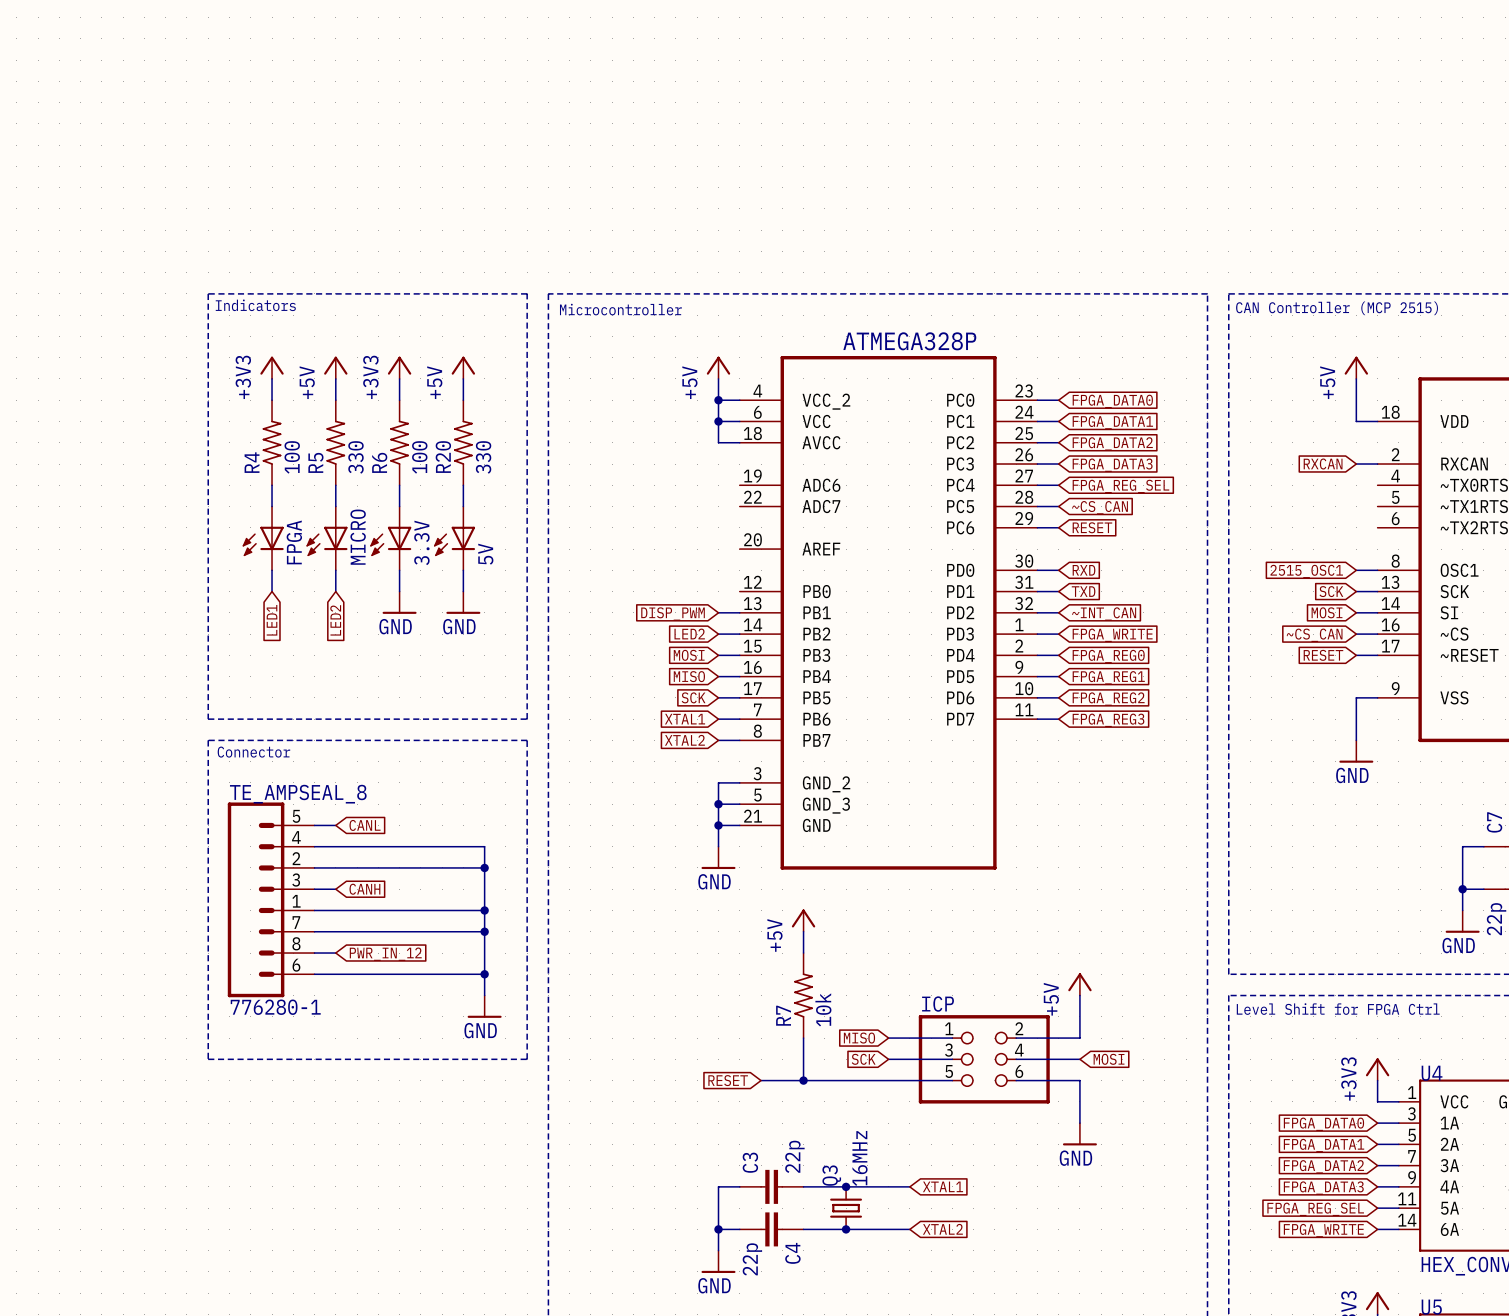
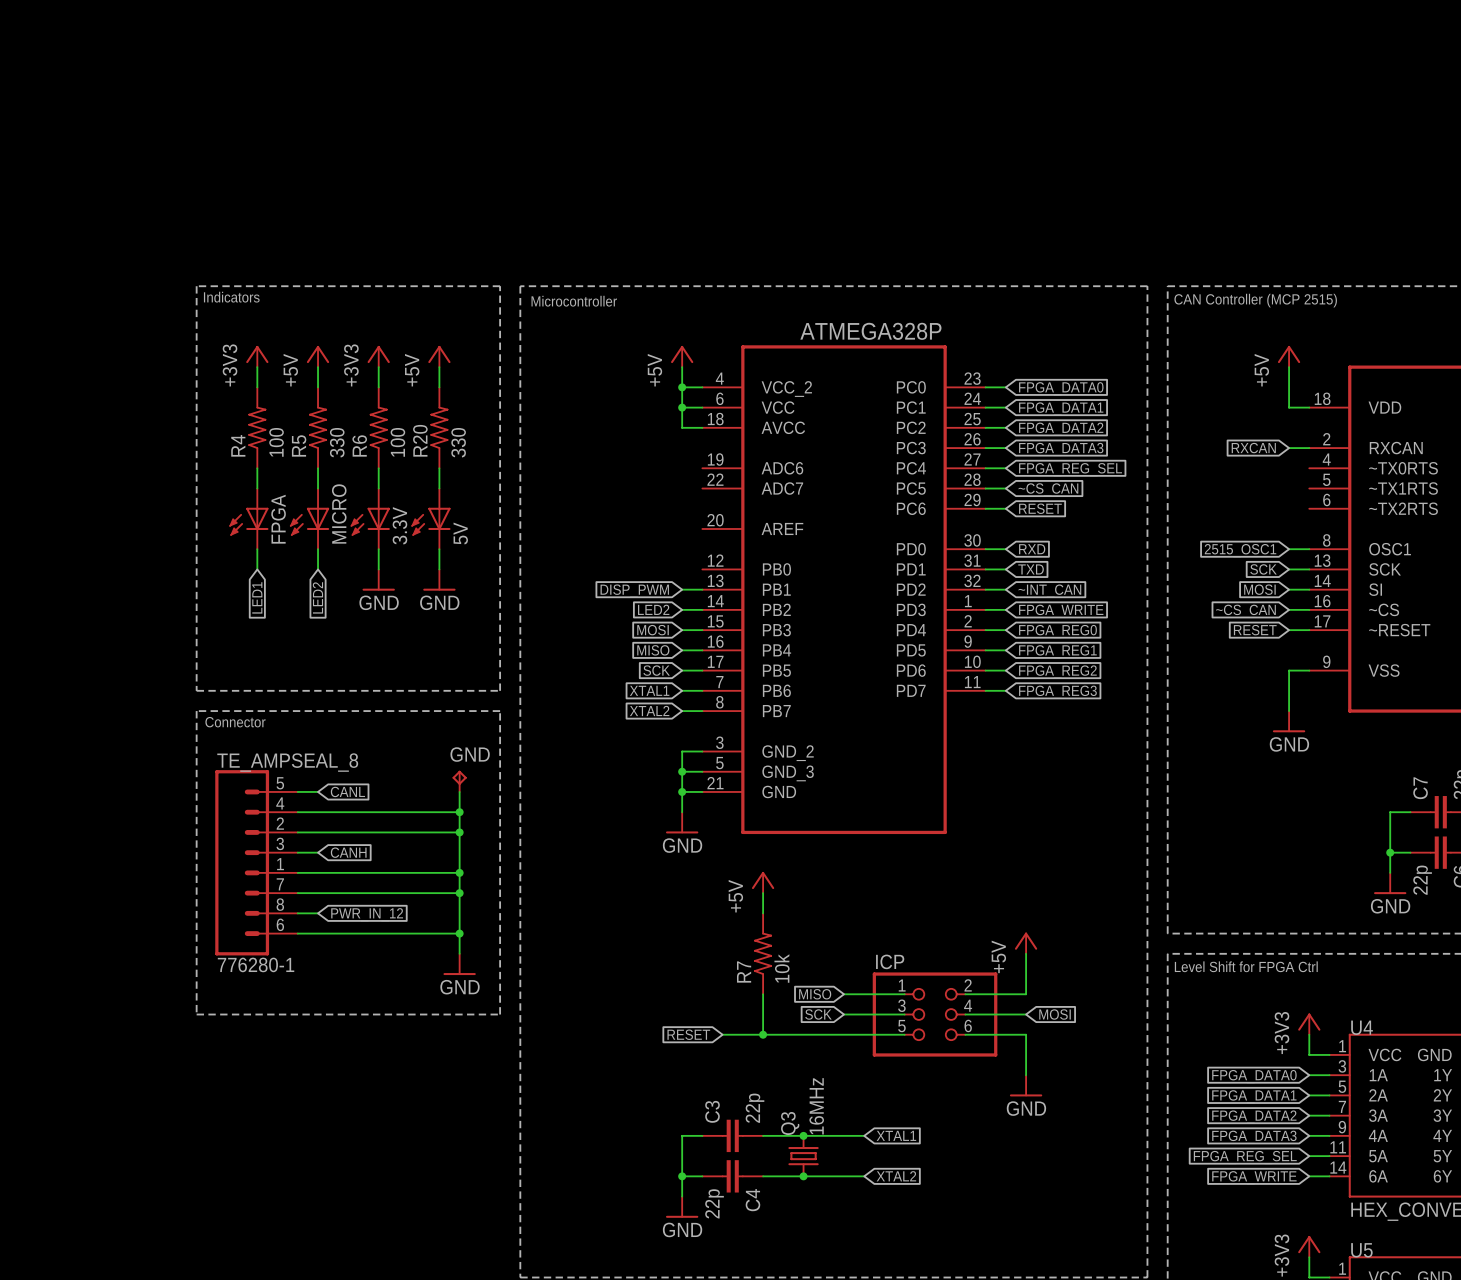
GND: none -> (459, 781)
wire: none -> (459, 791) (459, 812)
junction: none -> (459, 812)

